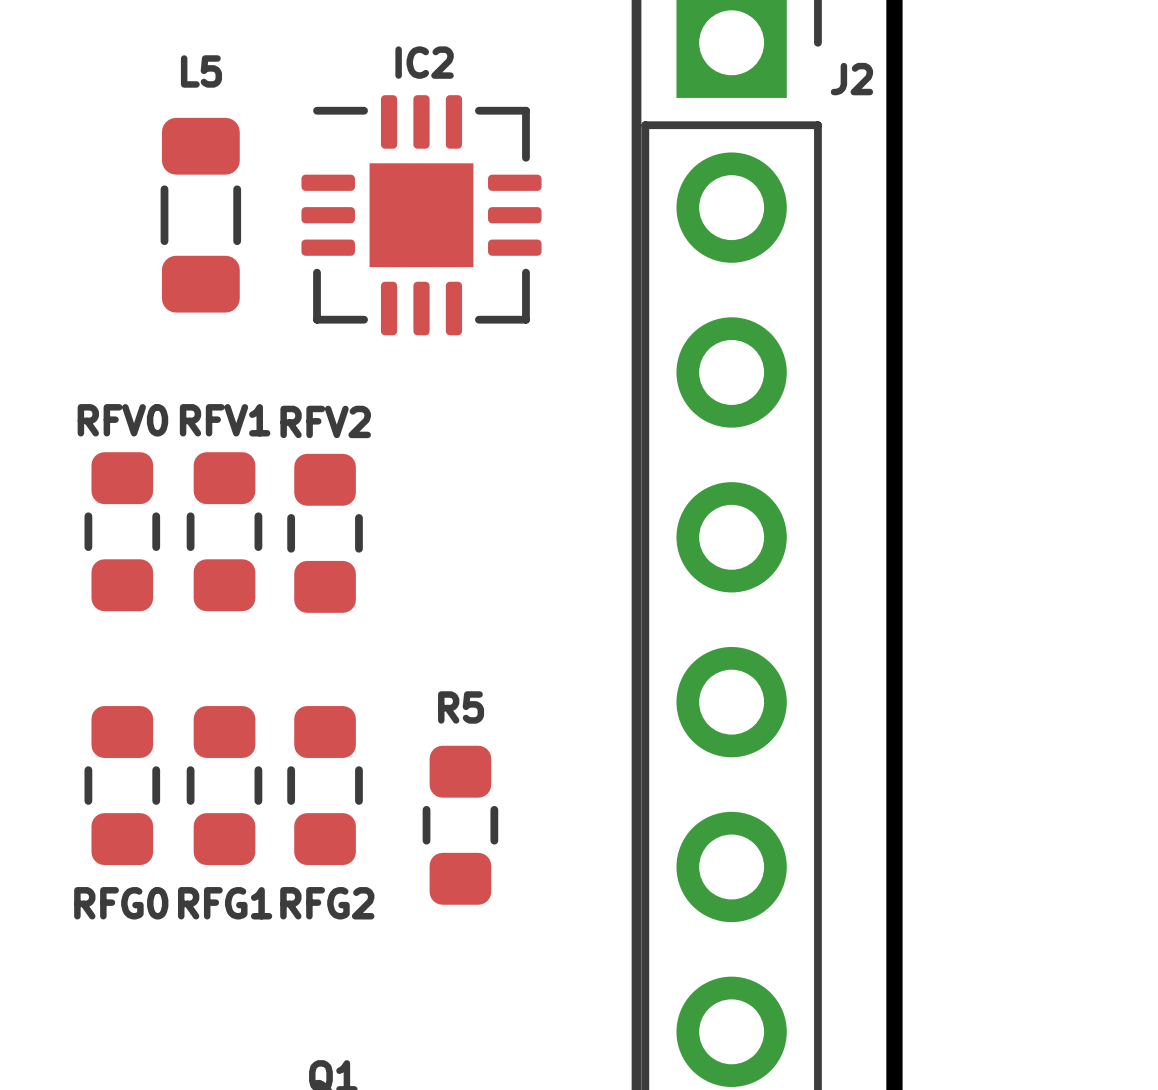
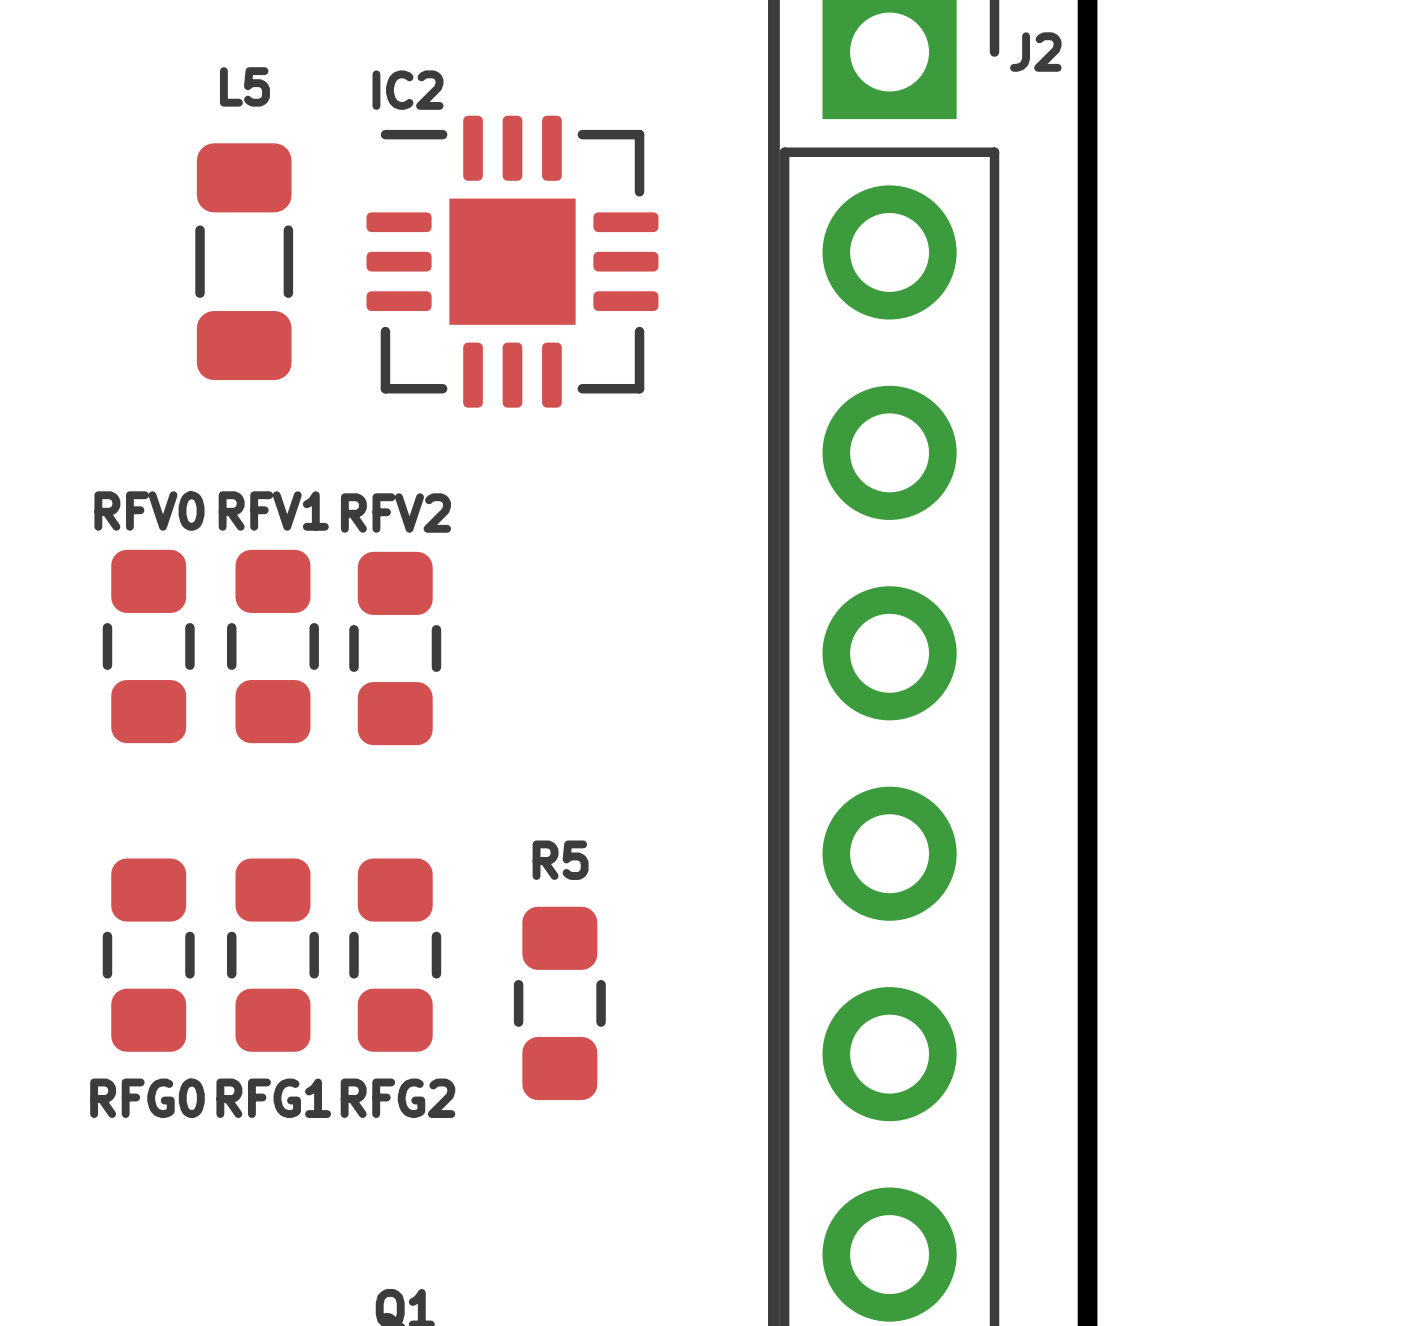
IC2 name position: IC2 (424, 62) -> IC2 (408, 90)
J2 name position: J2 (851, 79) -> J2 (1035, 52)

